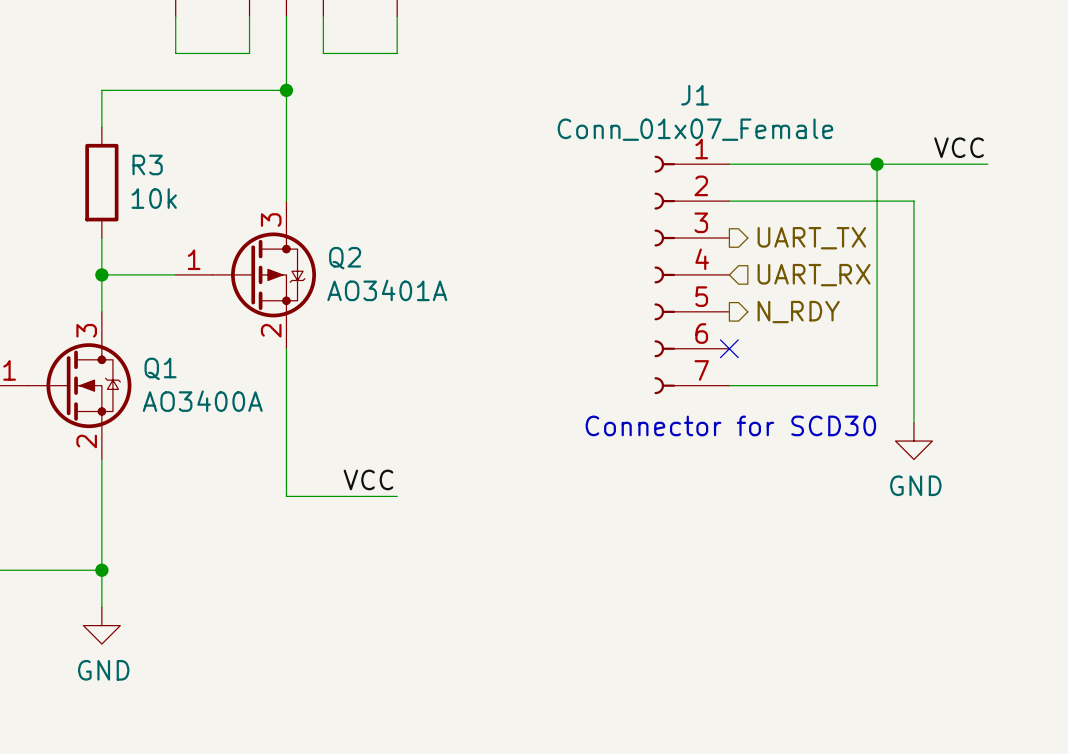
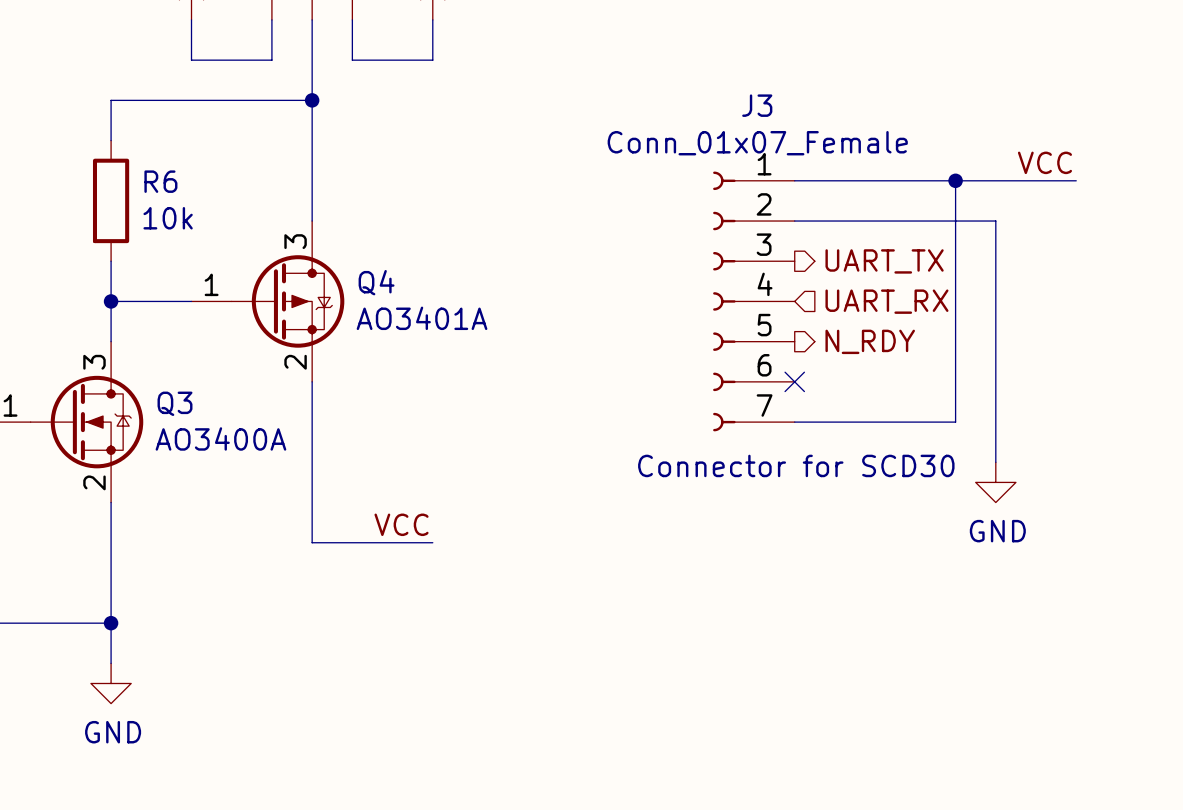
J1 name: J1 (694, 95) -> J3 (757, 105)
R3 name: R3 (147, 164) -> R6 (160, 181)
Q2 name: Q2 (345, 258) -> Q4 (376, 282)
Q1 name: Q1 (160, 368) -> Q3 (174, 403)

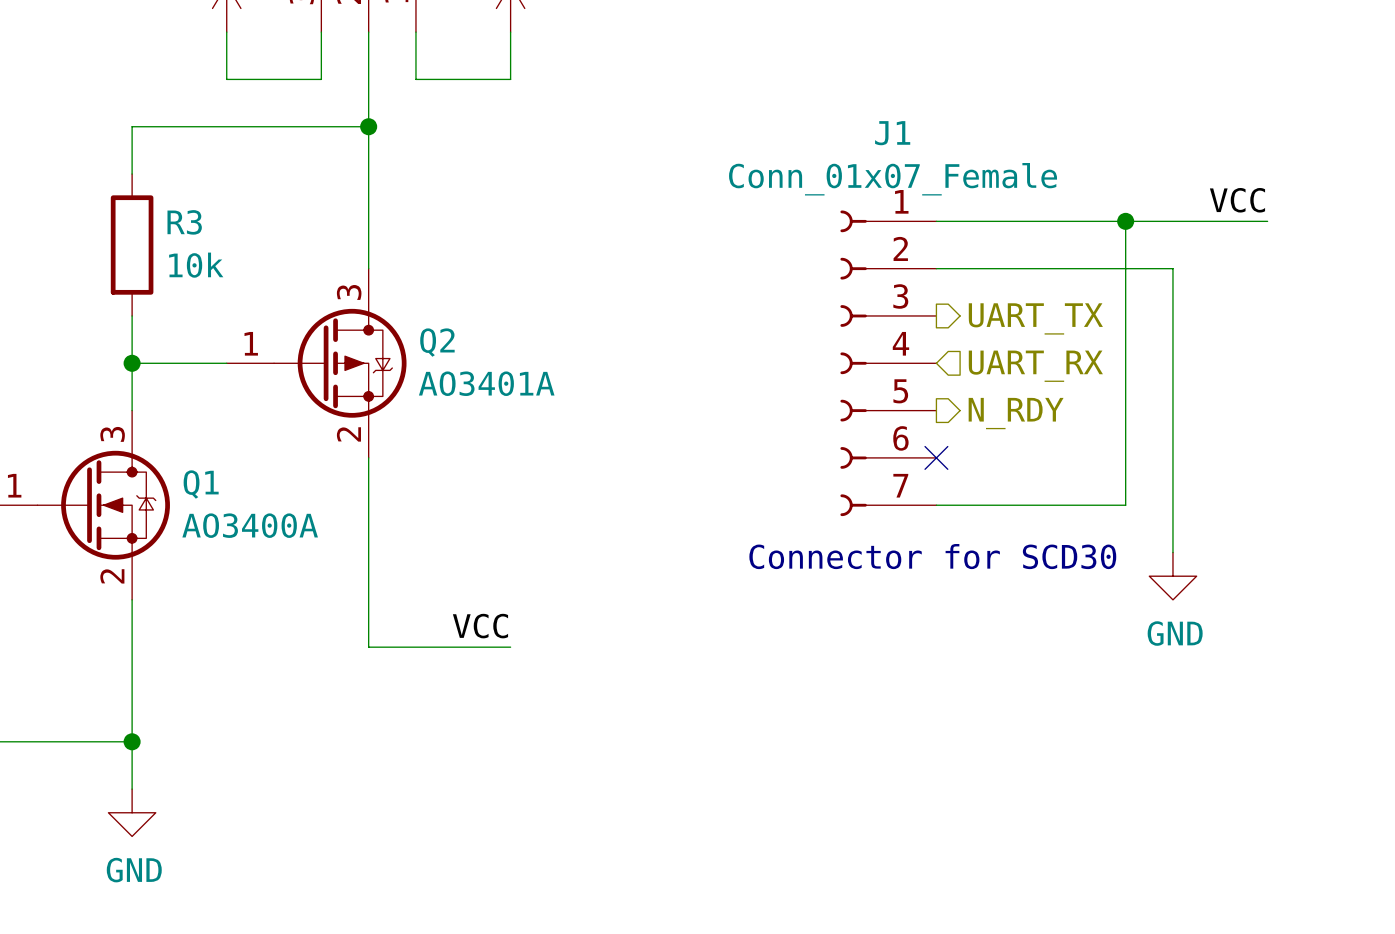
J3 name: J3 (757, 105) -> J1 (892, 133)
R6 name: R6 (160, 181) -> R3 (184, 222)
Q4 name: Q4 (376, 282) -> Q2 (437, 342)
Q3 name: Q3 (174, 403) -> Q1 (201, 484)

